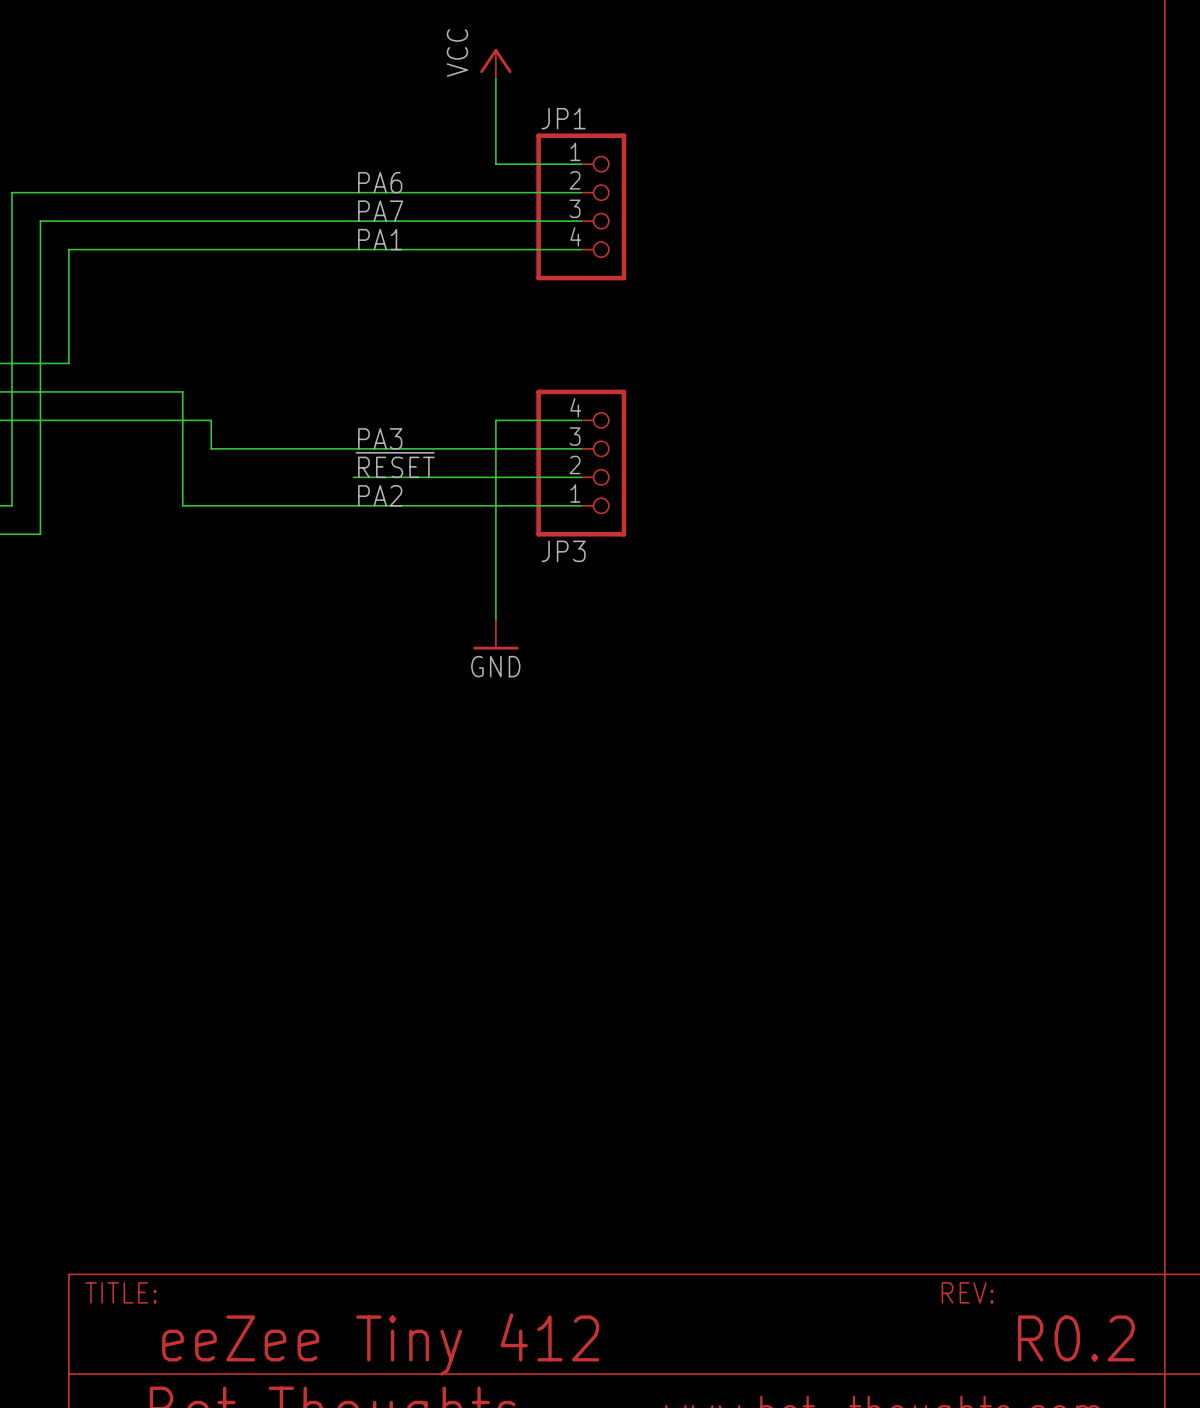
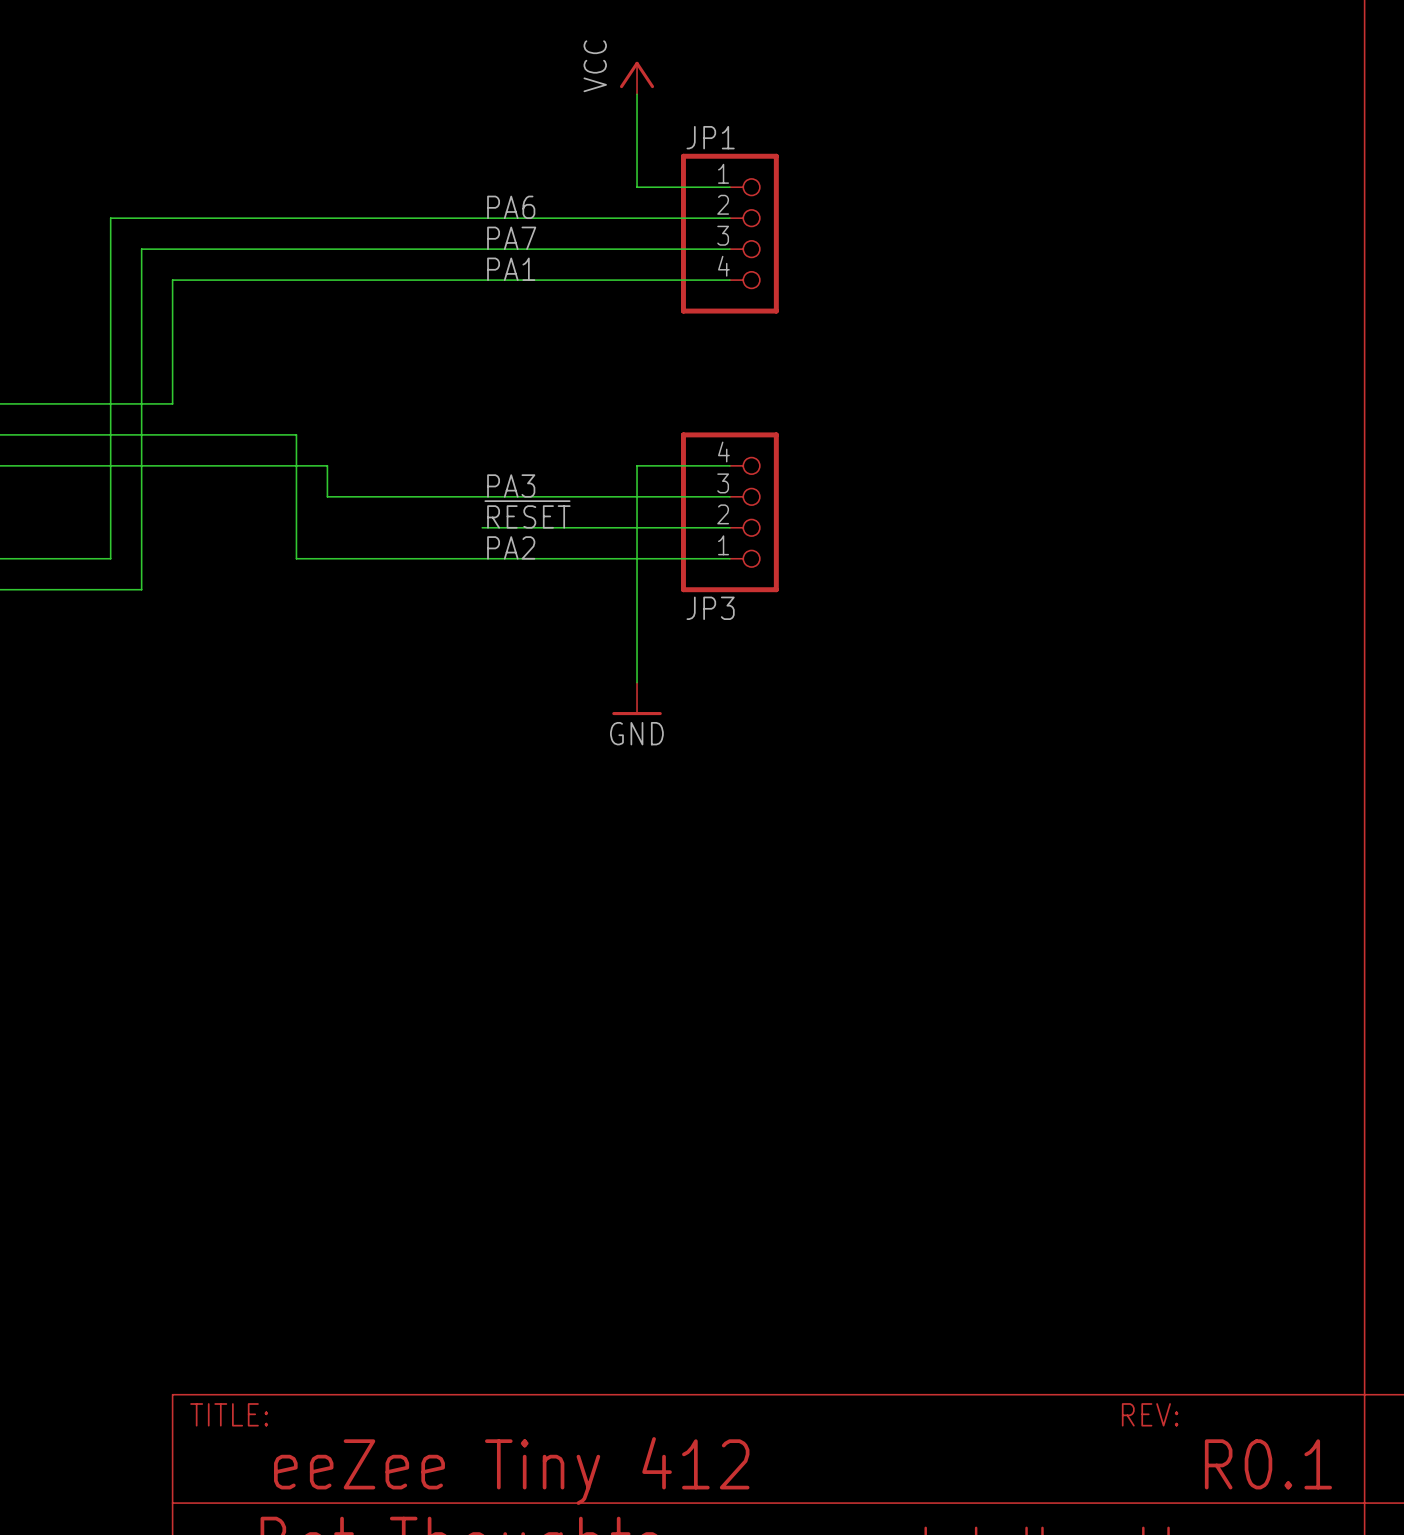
text: R0.2 (1076, 1338) -> R0.1 (1268, 1464)

